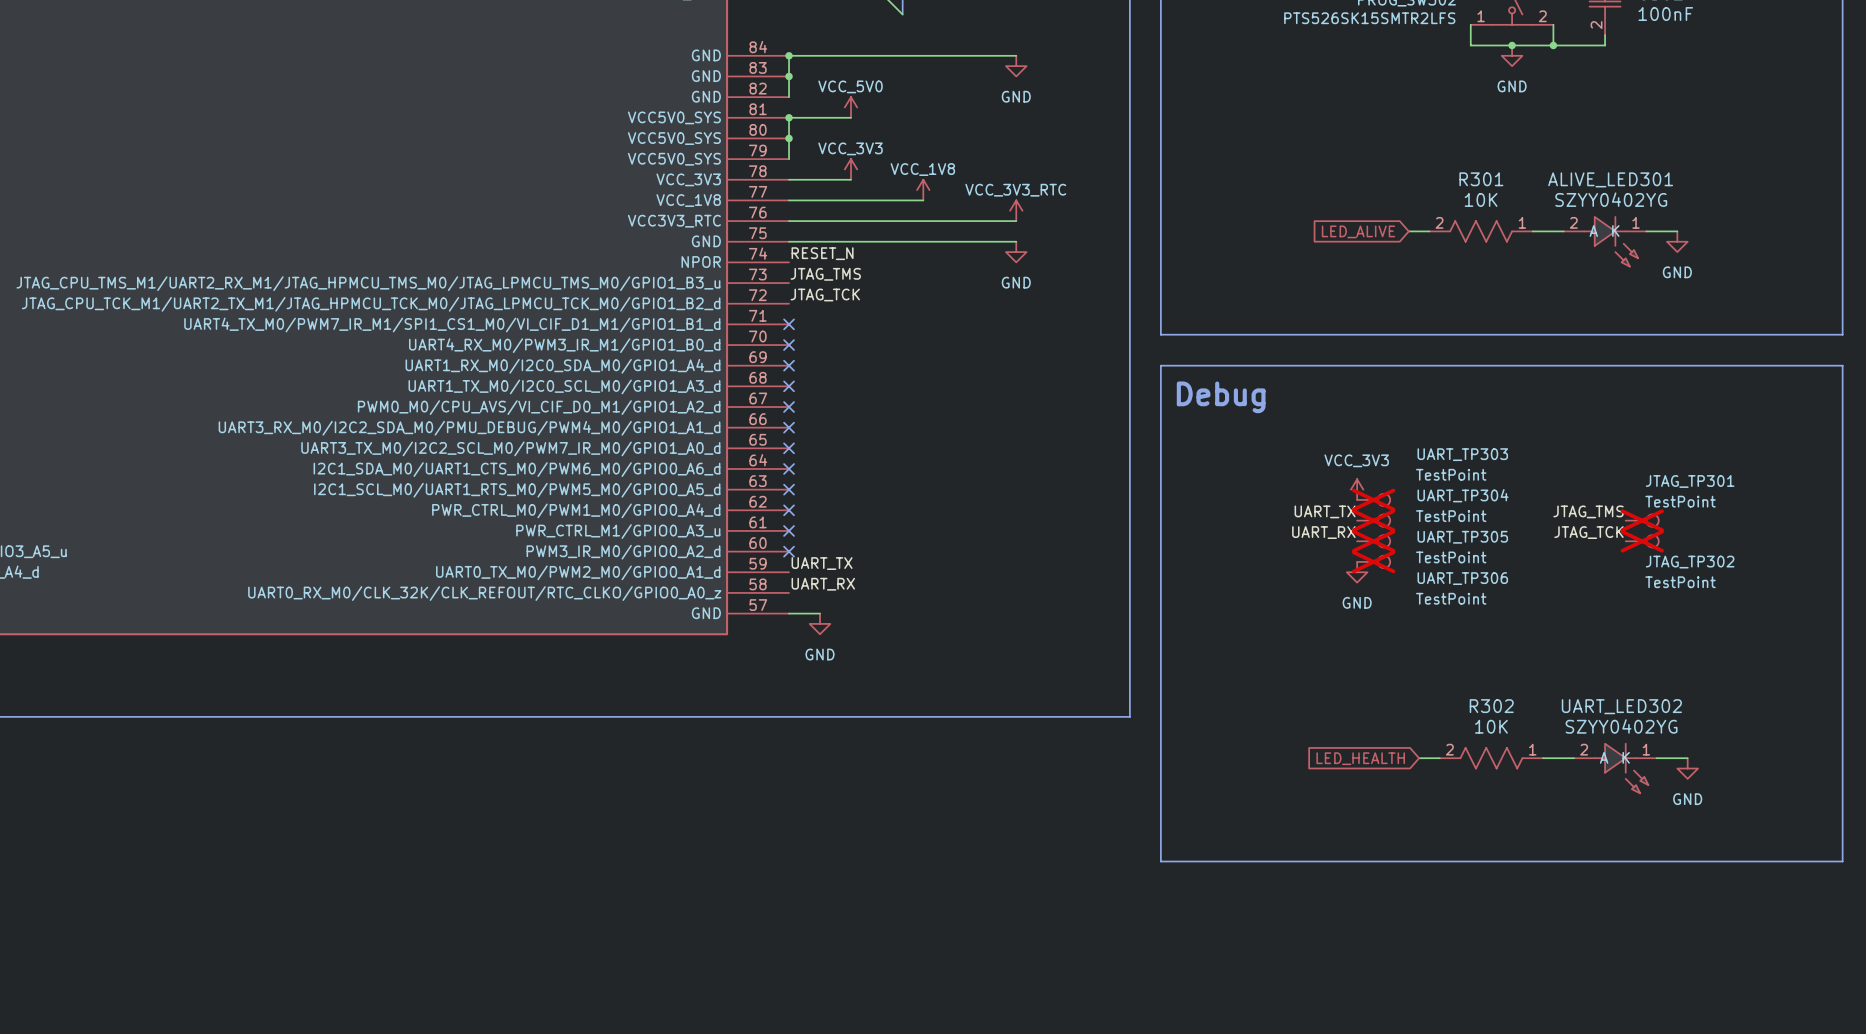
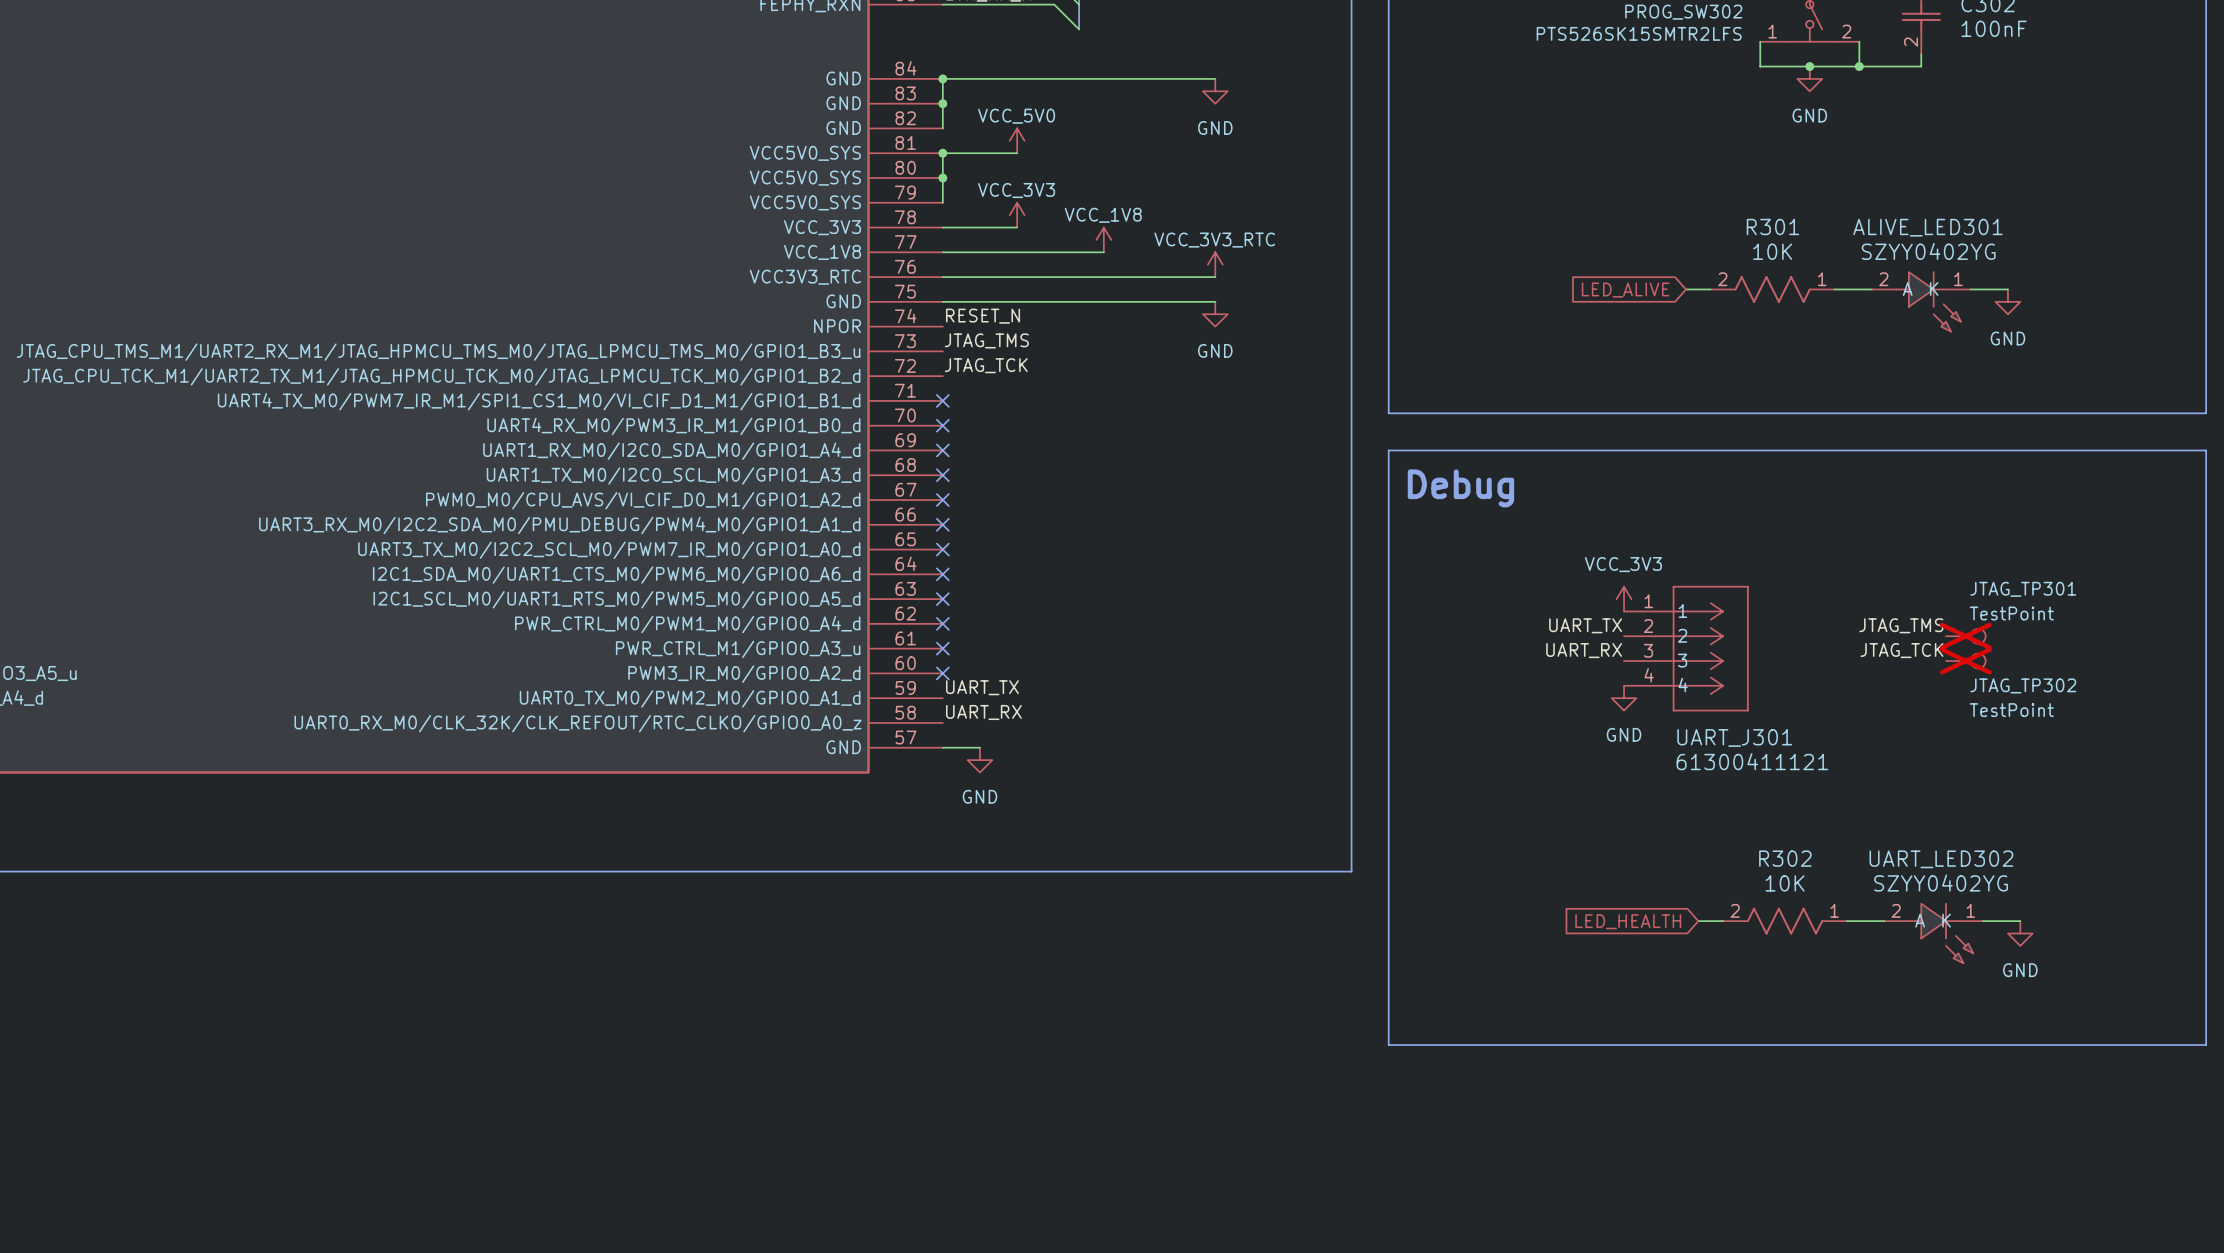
UART_TP303: TestPoint (1373, 499) -> none
UART_TP304: TestPoint (1373, 520) -> none
UART_J301: none -> 61300411121 (1686, 648)
UART_TP305: TestPoint (1373, 541) -> none
UART_TP306: TestPoint (1373, 561) -> none

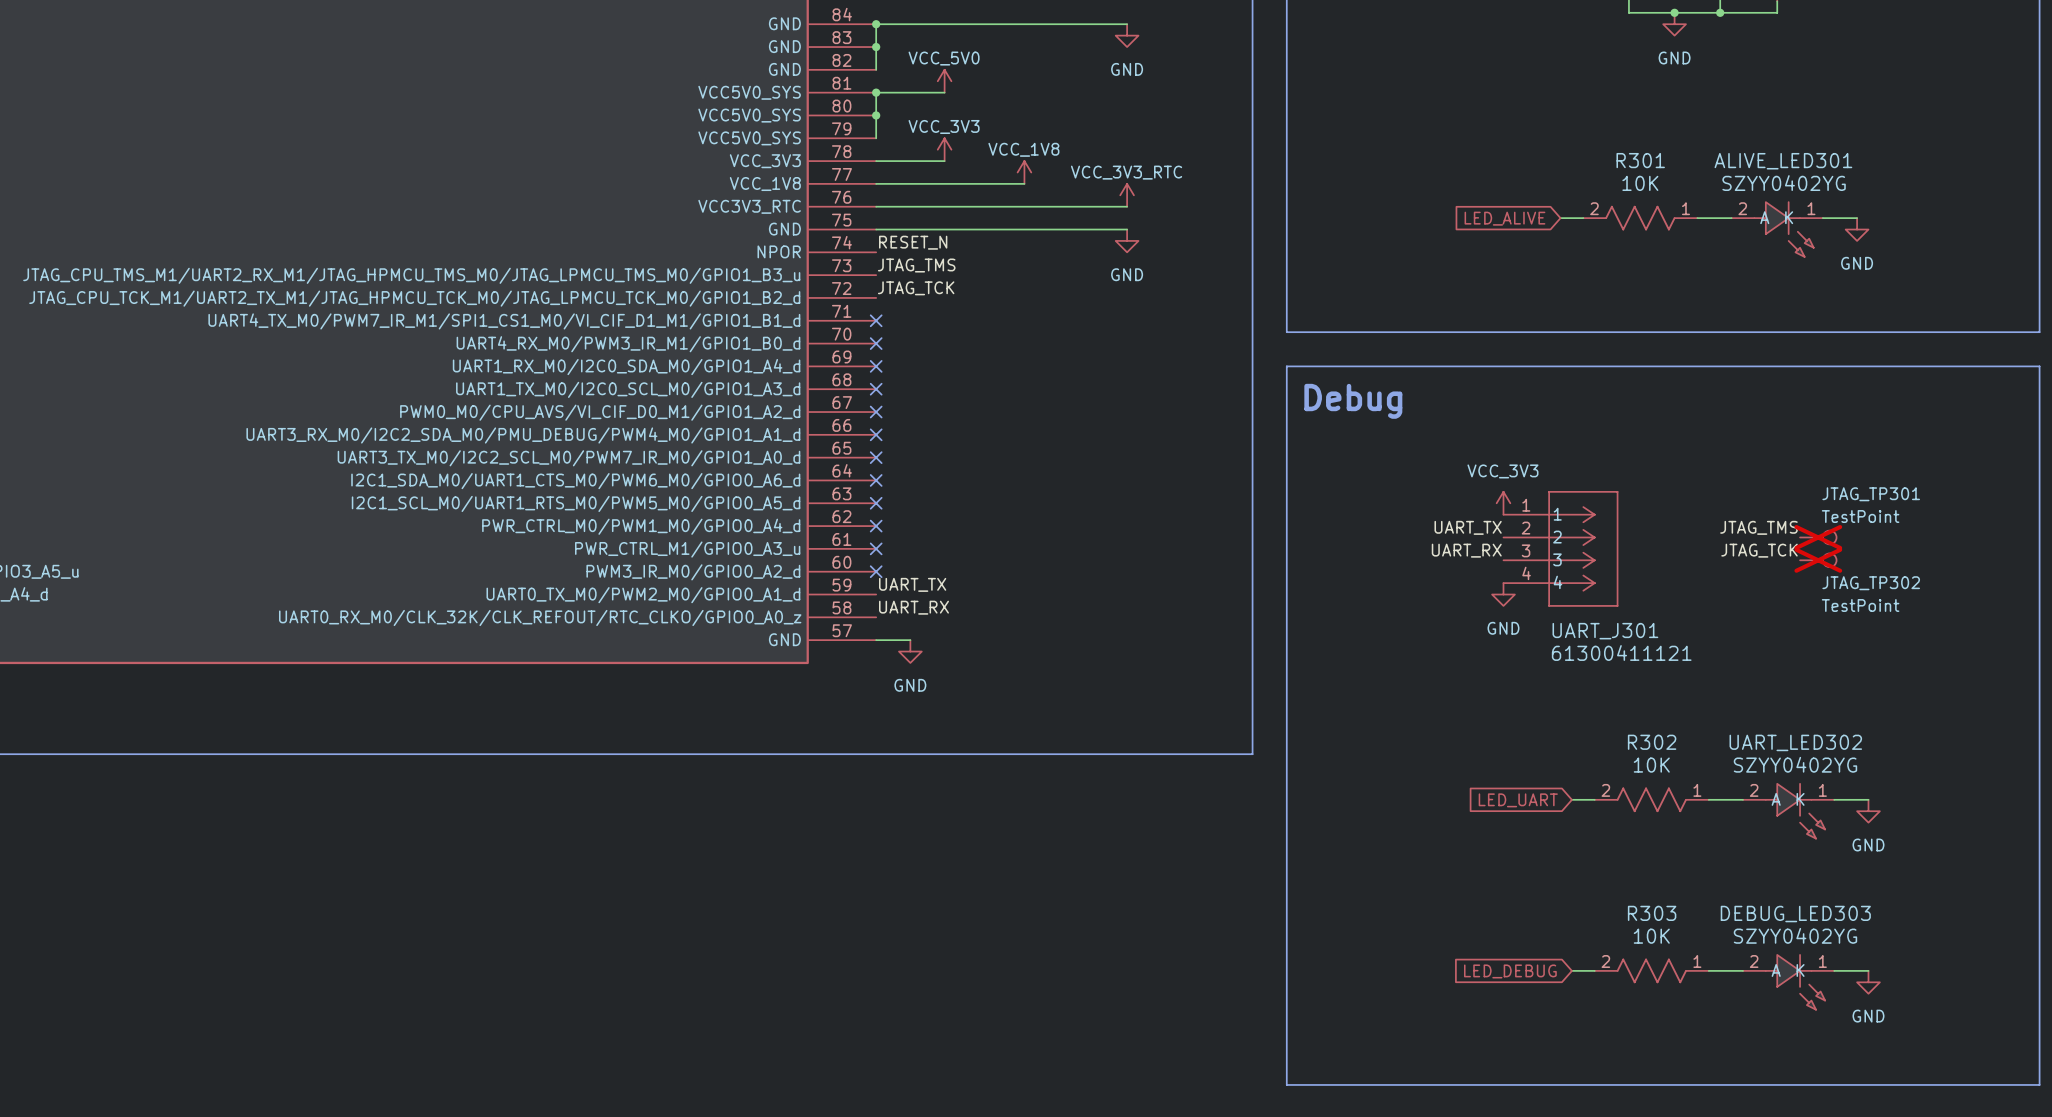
global label: LED_HEALTH (1628, 921) -> LED_UART (1518, 800)
line: (1388, 1044) (2206, 1044) -> (1286, 913) (1286, 1084) (2039, 1084) (2039, 913)
wire: none -> (1571, 970) (1594, 970)
R303: none -> 10K (1651, 970)
wire: none -> (1708, 970) (1743, 970)
wire: none -> (1834, 970) (1868, 970)
global label: none -> LED_DEBUG (1510, 971)
DEBUG_LED303: none -> SZYY0402YG (1788, 982)
power symbol: none -> GND (1868, 982)

